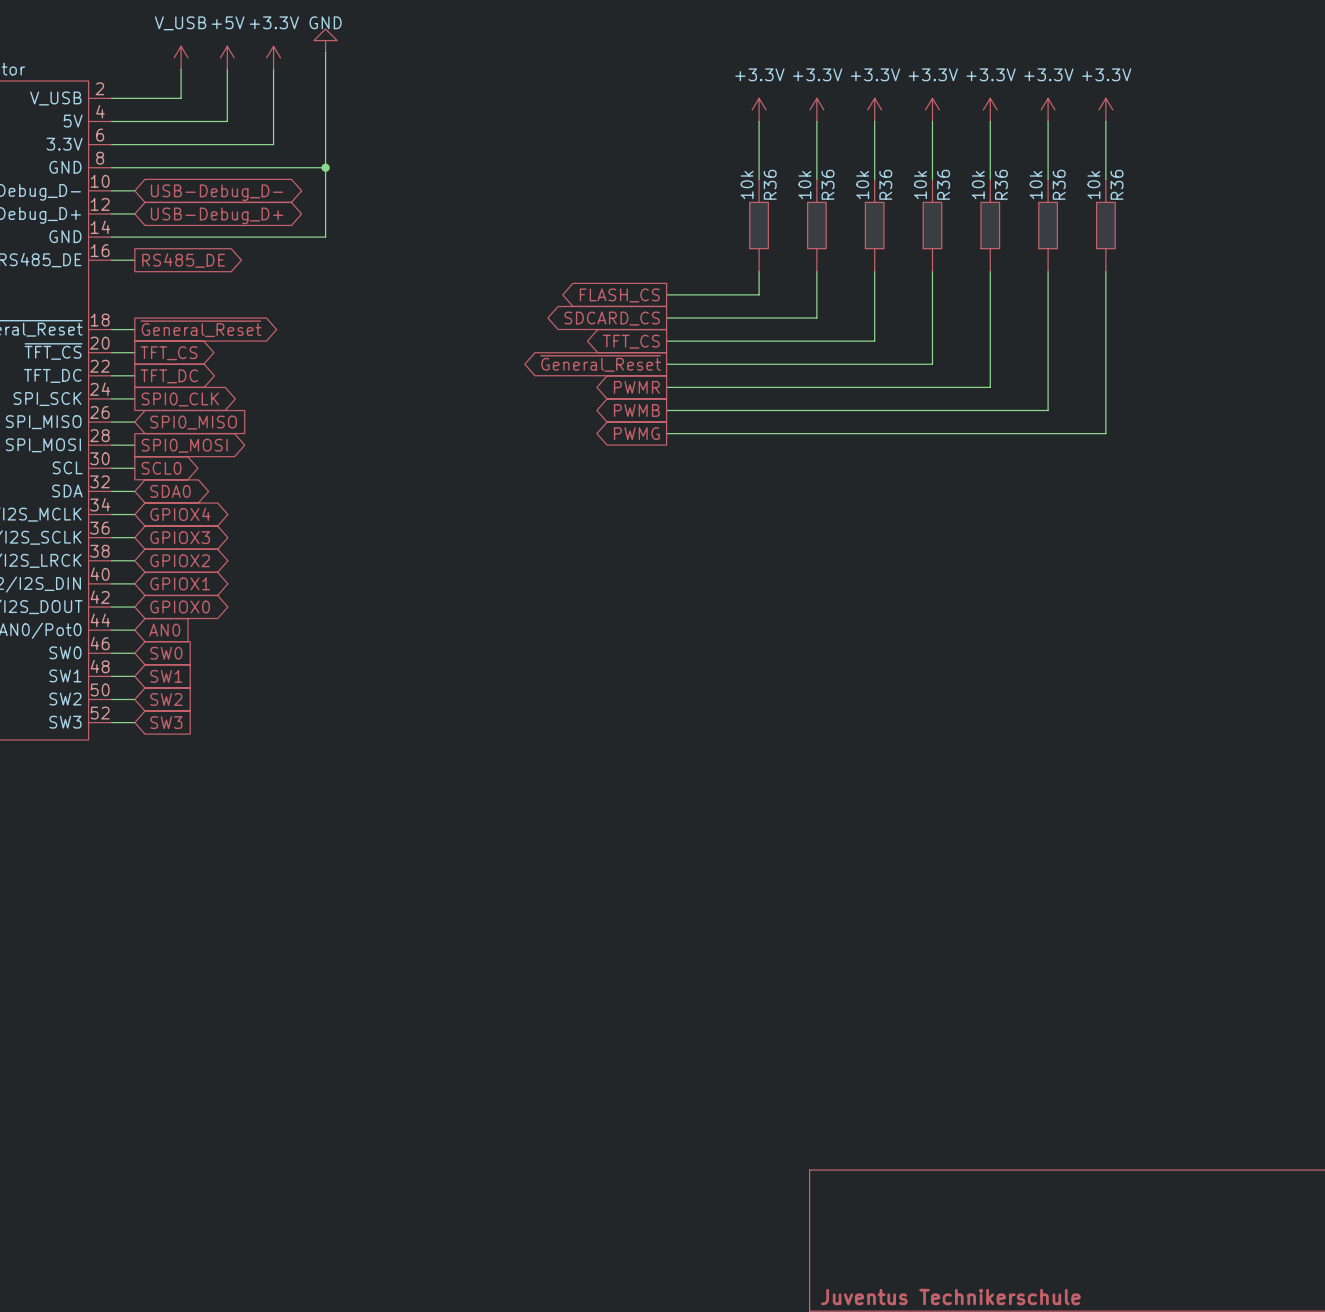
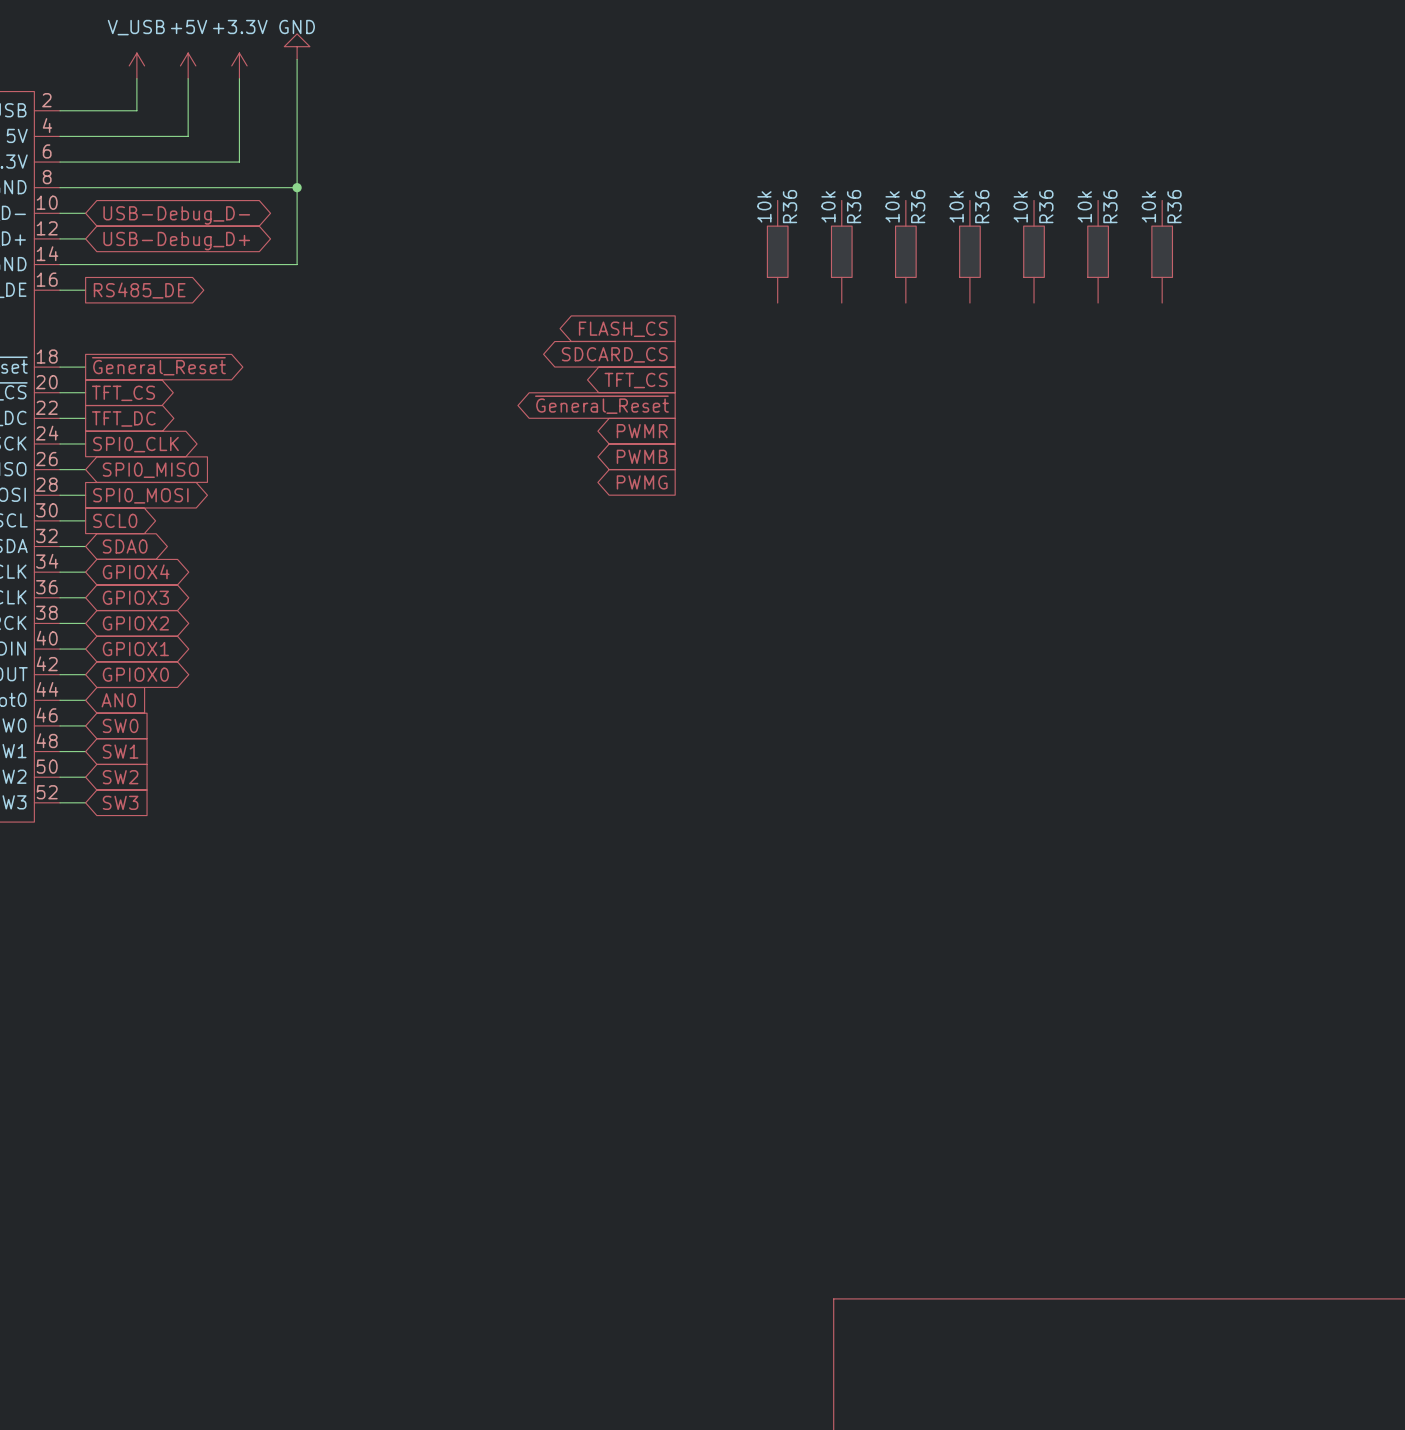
power symbol: +3.3V (759, 109) -> none
power symbol: +3.3V (816, 109) -> none
power symbol: +3.3V (874, 109) -> none
power symbol: +3.3V (932, 109) -> none
power symbol: +3.3V (990, 109) -> none
power symbol: +3.3V (1048, 109) -> none
power symbol: +3.3V (1105, 109) -> none
wire: (759, 121) (759, 179) -> none
wire: (816, 121) (816, 179) -> none
wire: (874, 121) (874, 179) -> none
wire: (932, 121) (932, 179) -> none
wire: (990, 121) (990, 179) -> none
wire: (1048, 121) (1048, 179) -> none
wire: (1105, 121) (1105, 179) -> none
wire: (759, 271) (759, 294) (666, 294) -> none
wire: (816, 271) (816, 318) (666, 318) -> none
wire: (874, 271) (874, 341) (666, 341) -> none
wire: (932, 271) (932, 364) (666, 364) -> none
wire: (990, 271) (990, 387) (666, 387) -> none
wire: (1048, 271) (1048, 410) (666, 410) -> none
wire: (1105, 271) (1105, 433) (666, 433) -> none

